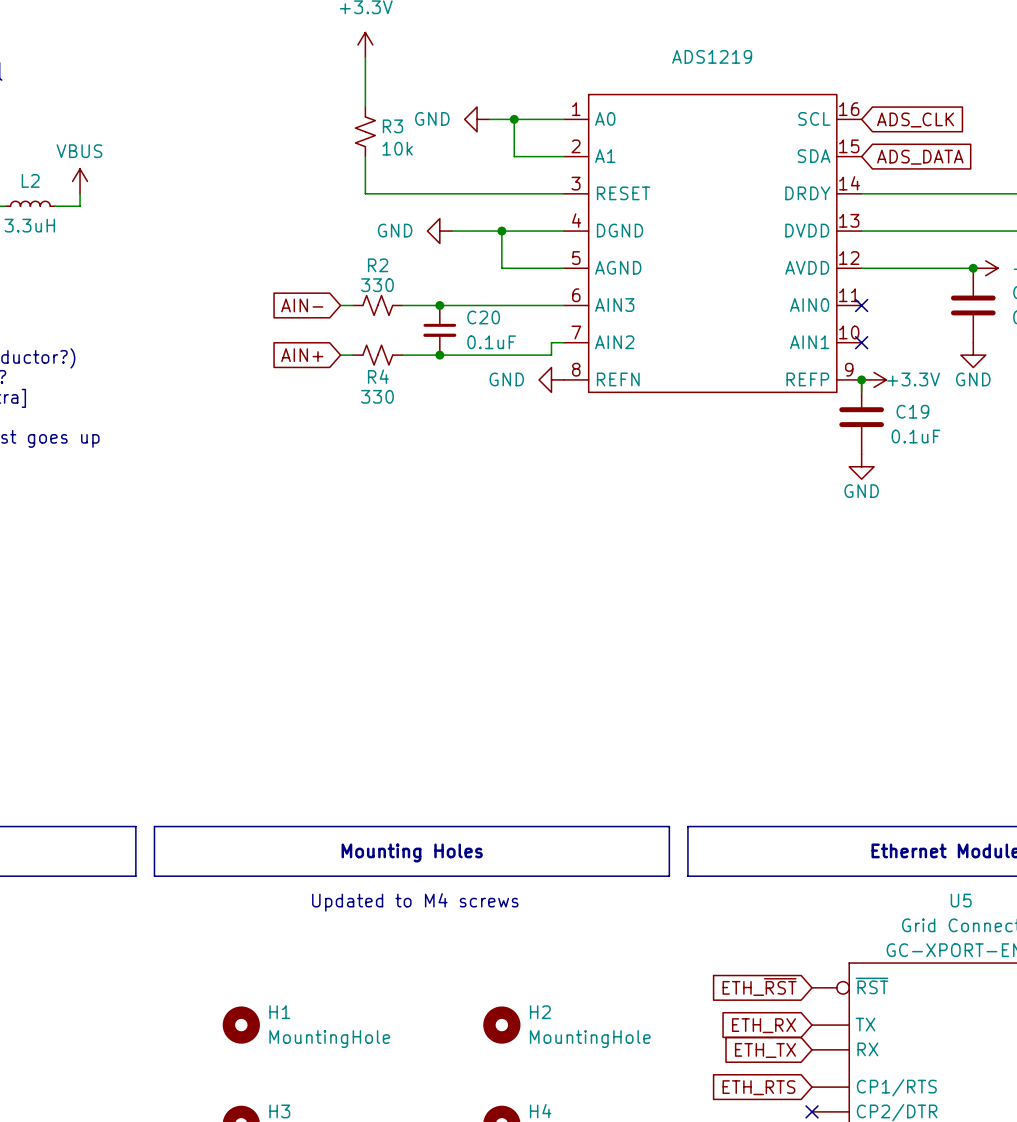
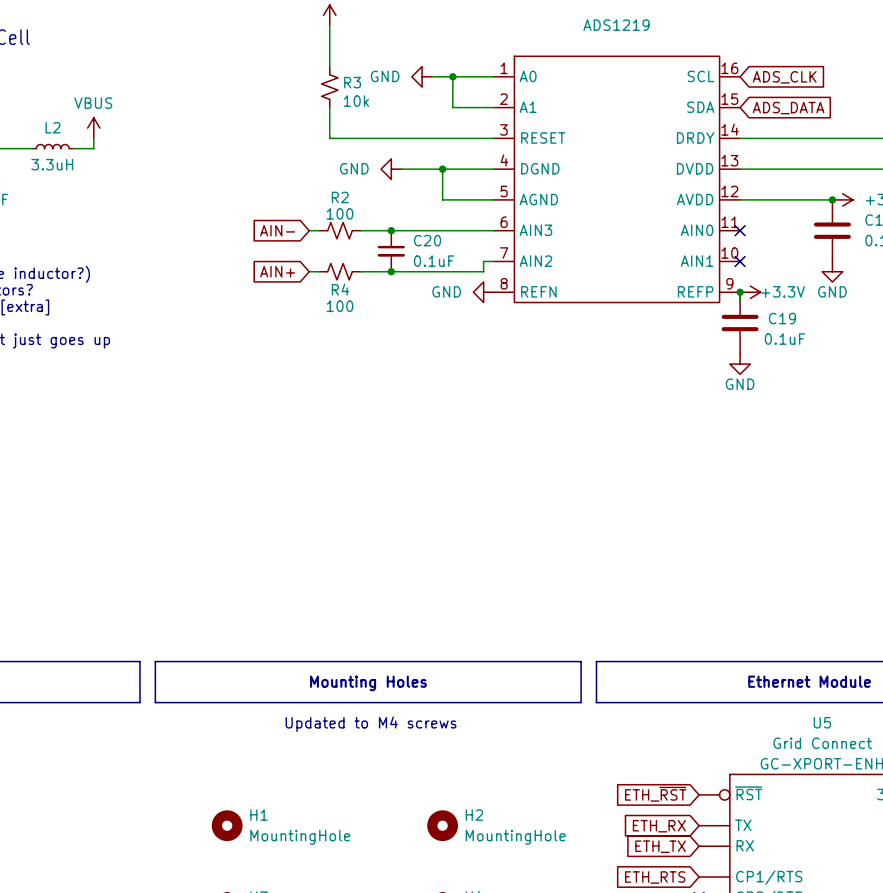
R2 value: 330 (377, 285) -> 100 (340, 213)
R4 value: 330 (377, 396) -> 100 (340, 306)

